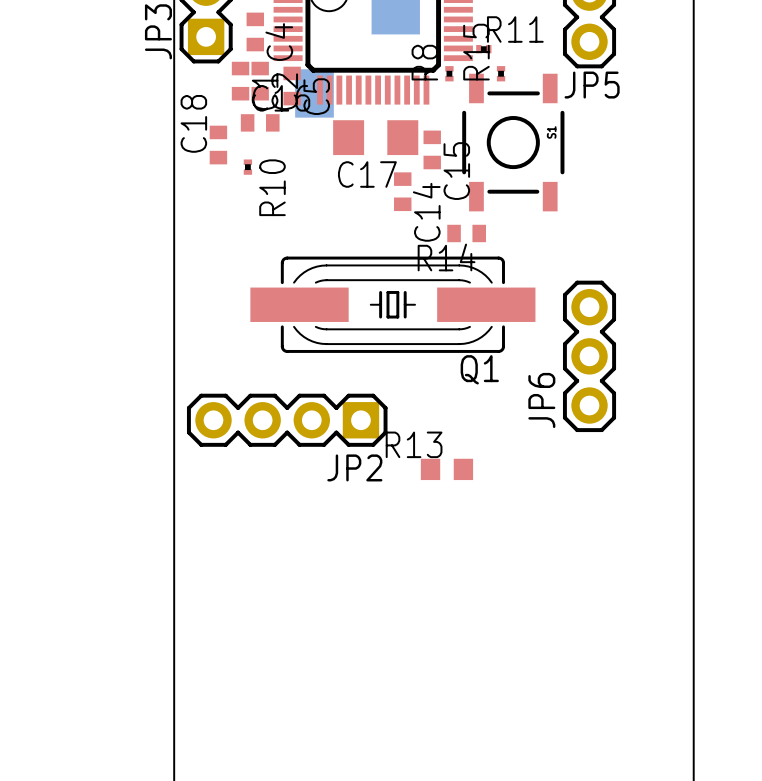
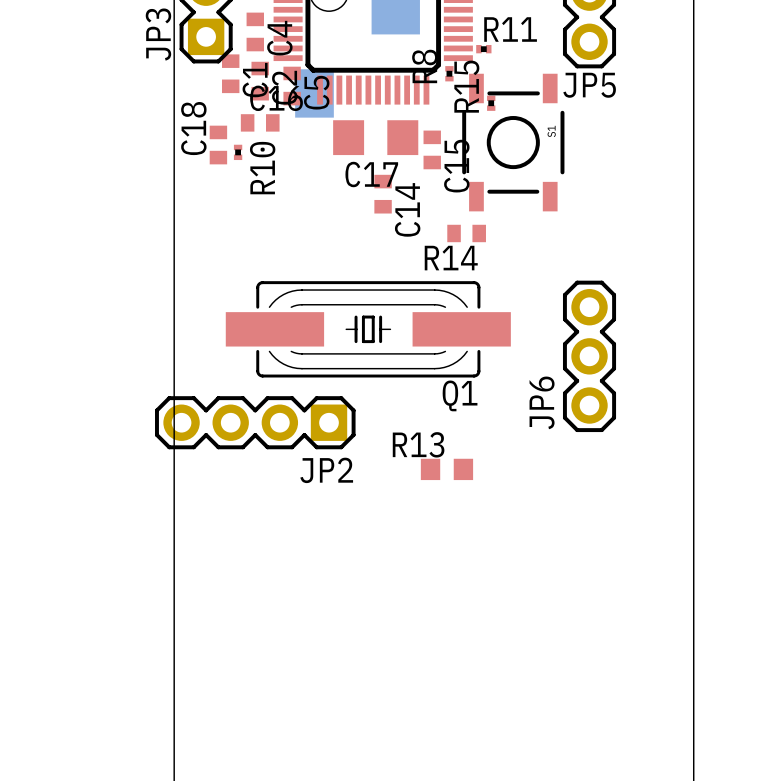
R15 position: (501, 73) -> (491, 103)
C1 position: (240, 81) -> (230, 73)
R10 position: (247, 167) -> (238, 152)
C14 position: (402, 191) -> (383, 194)
Q1 position: (392, 304) -> (368, 329)
JP2 position: (287, 420) -> (255, 422)

